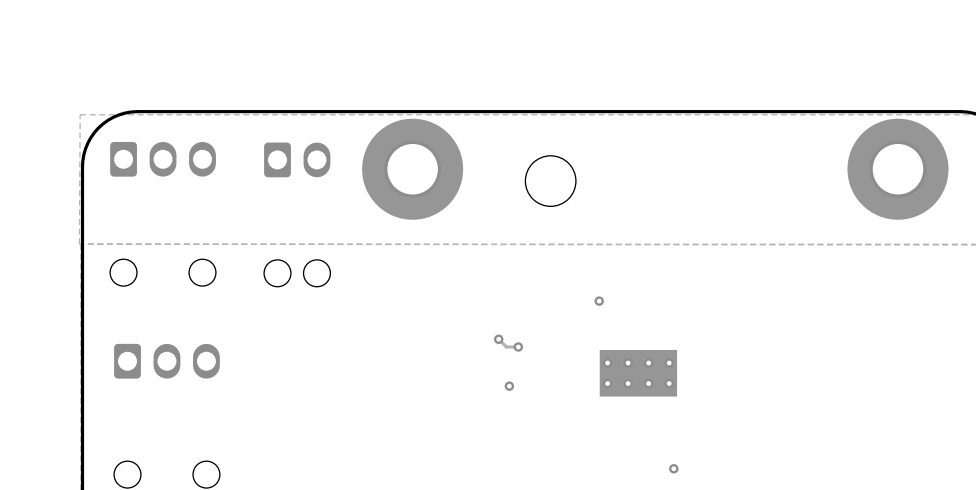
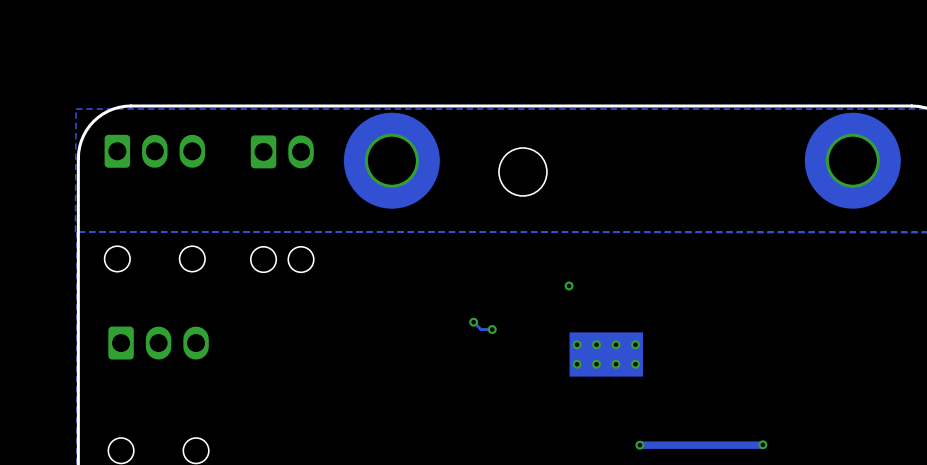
via: (509, 386) -> none
track: none -> (762, 444) (639, 445)
via: none -> (762, 444)

